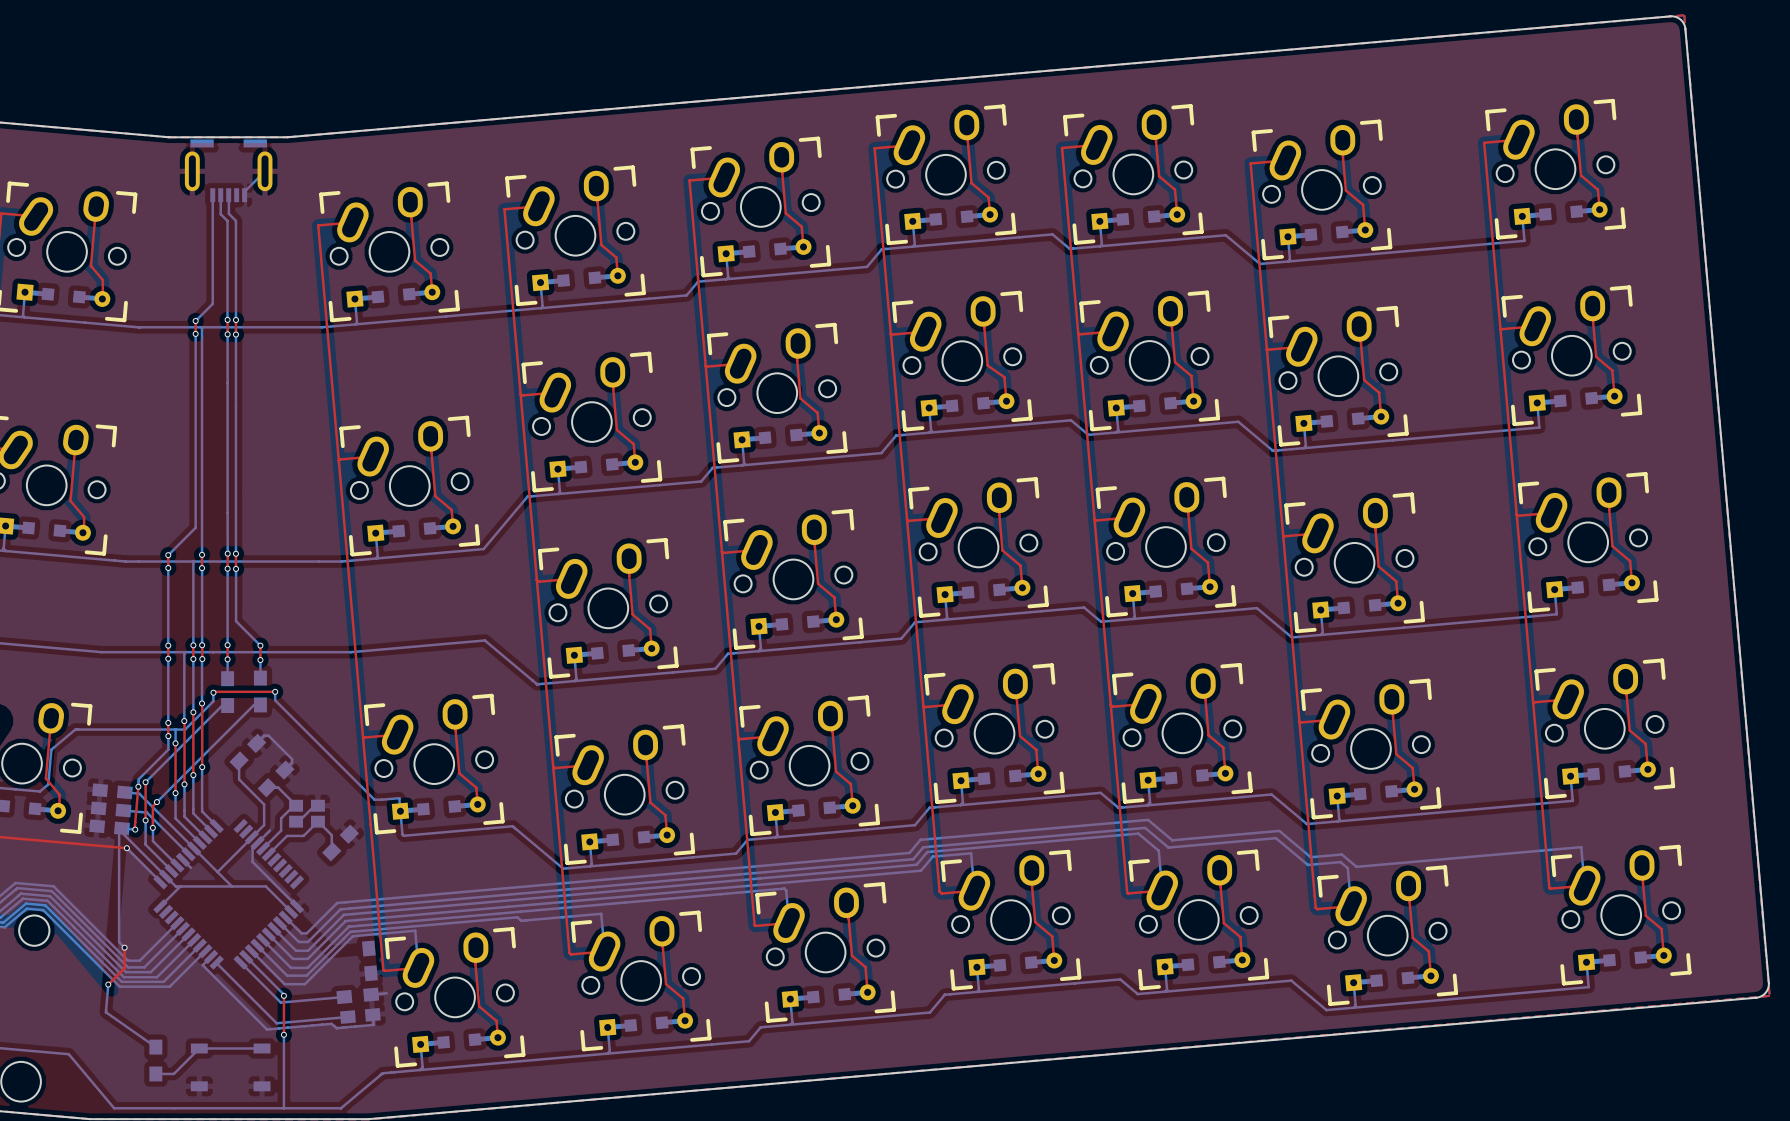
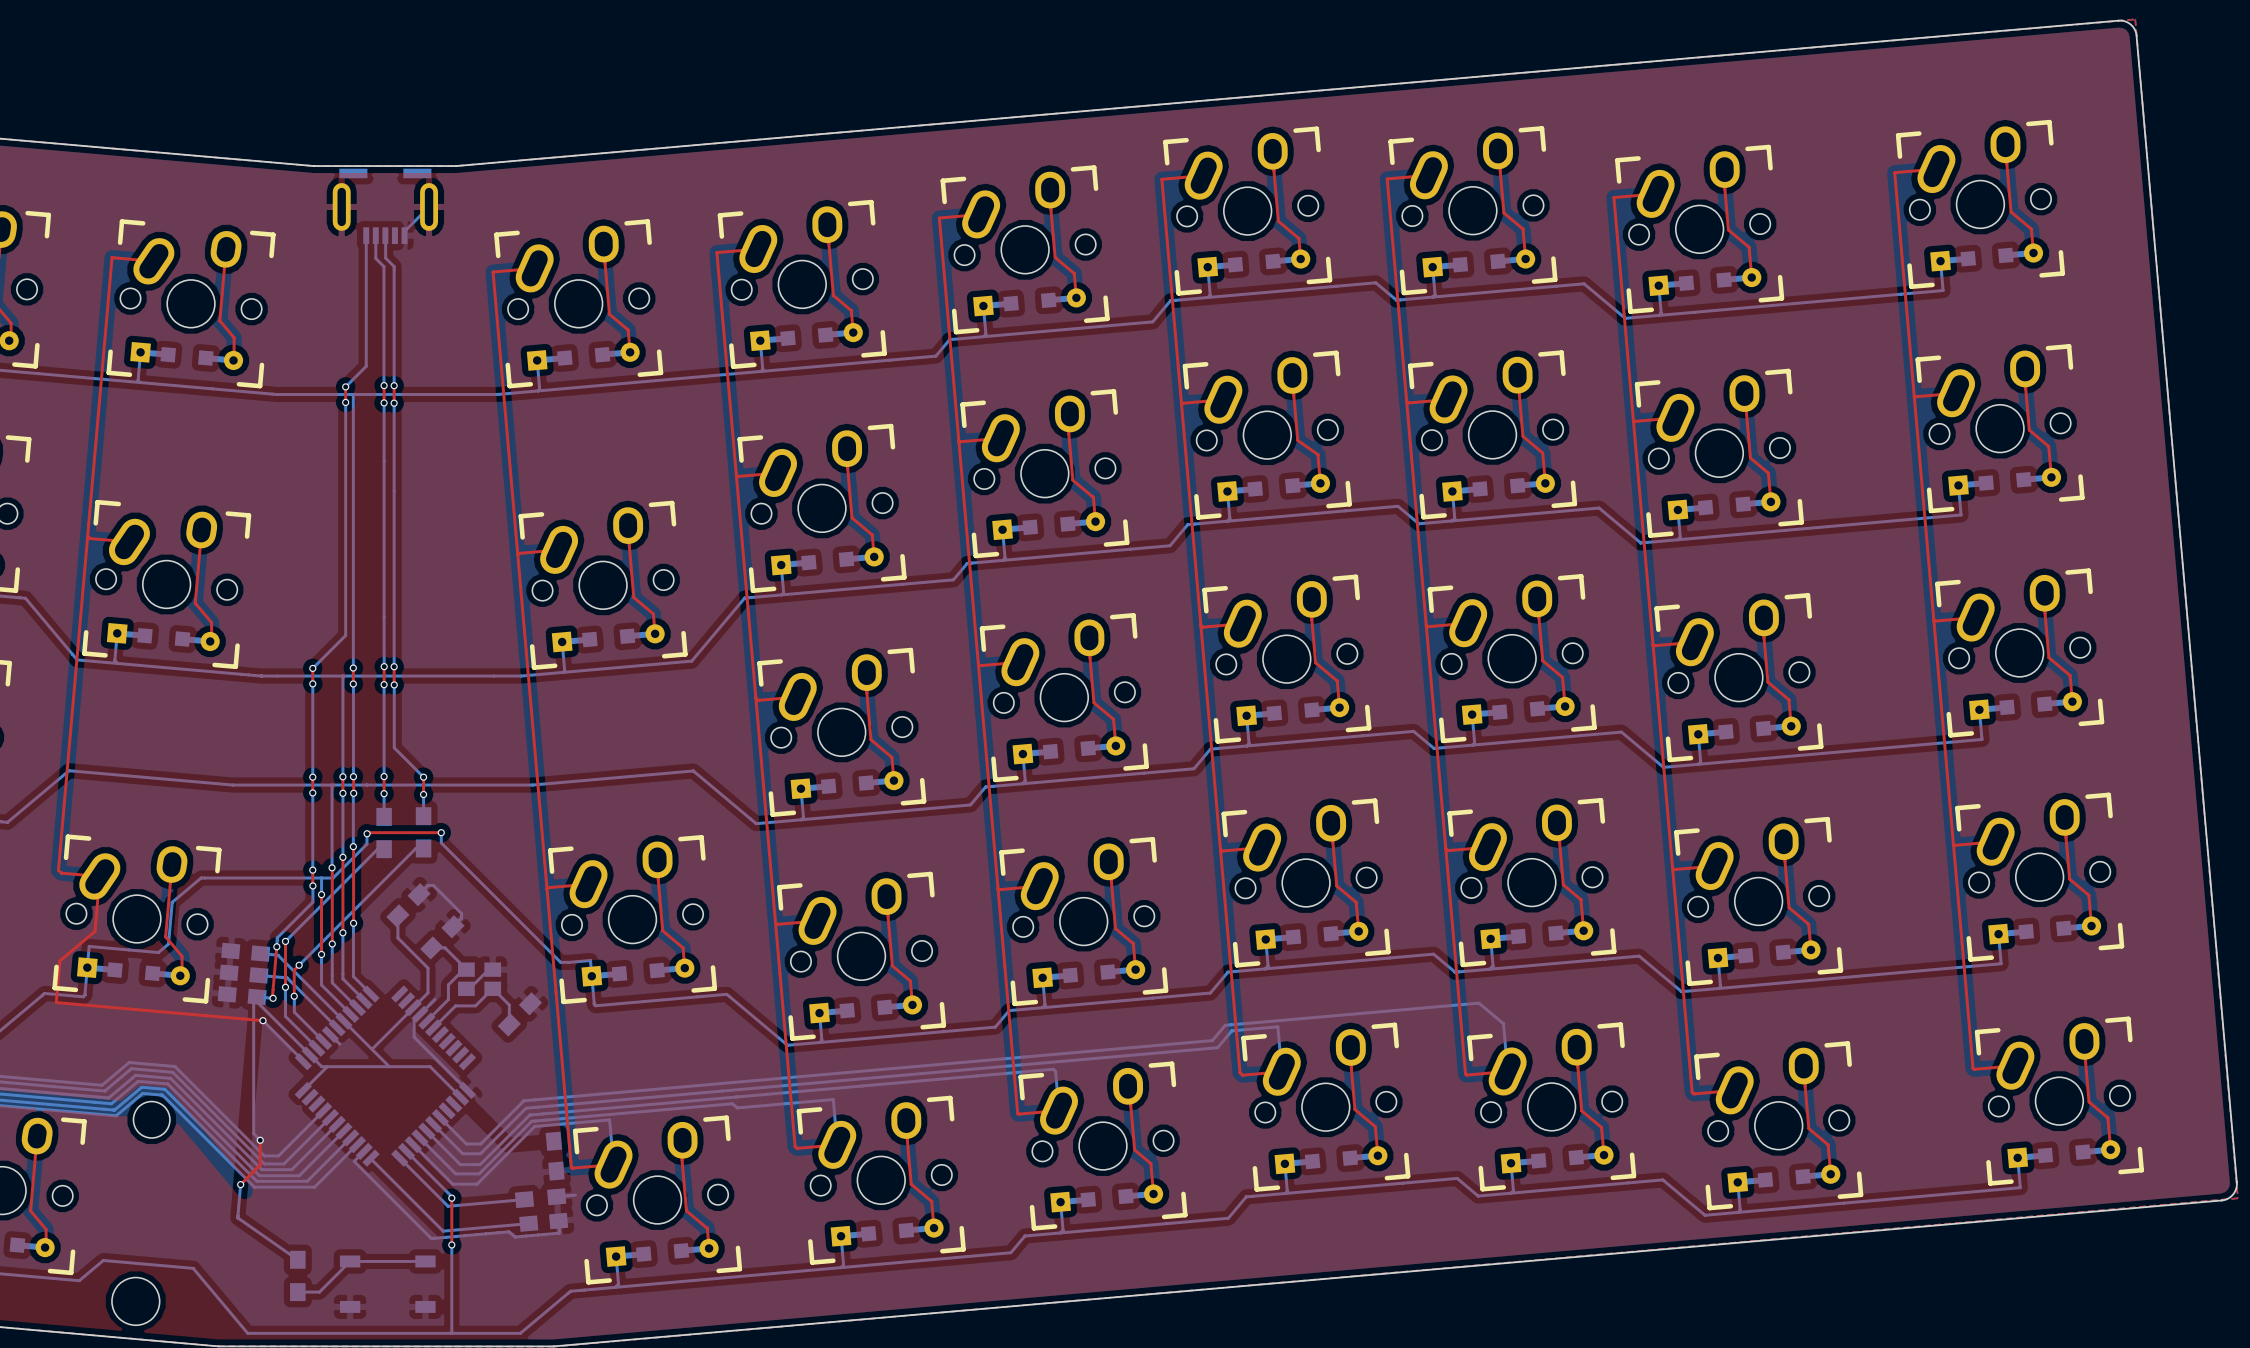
bottom track: (1172, 840) (1148, 819) (920, 839) (909, 852) (337, 903) (306, 933) (301, 933) (285, 917) -> none
bottom track: (1172, 840) (1279, 830) (1310, 857) (1341, 854) (1356, 866) -> none
bottom track: (923, 847) (913, 859) (340, 909) (307, 942) (298, 942) (280, 923) -> none
bottom track: (923, 847) (1145, 827) (1168, 847) -> none
bottom track: (1168, 847) (1275, 838) (1307, 864) -> none
bottom track: (1307, 864) (1340, 862) (1347, 868) -> none
bottom track: (1356, 866) (1581, 847) (1584, 885) -> none
bottom track: (1347, 868) (1351, 906) -> none

